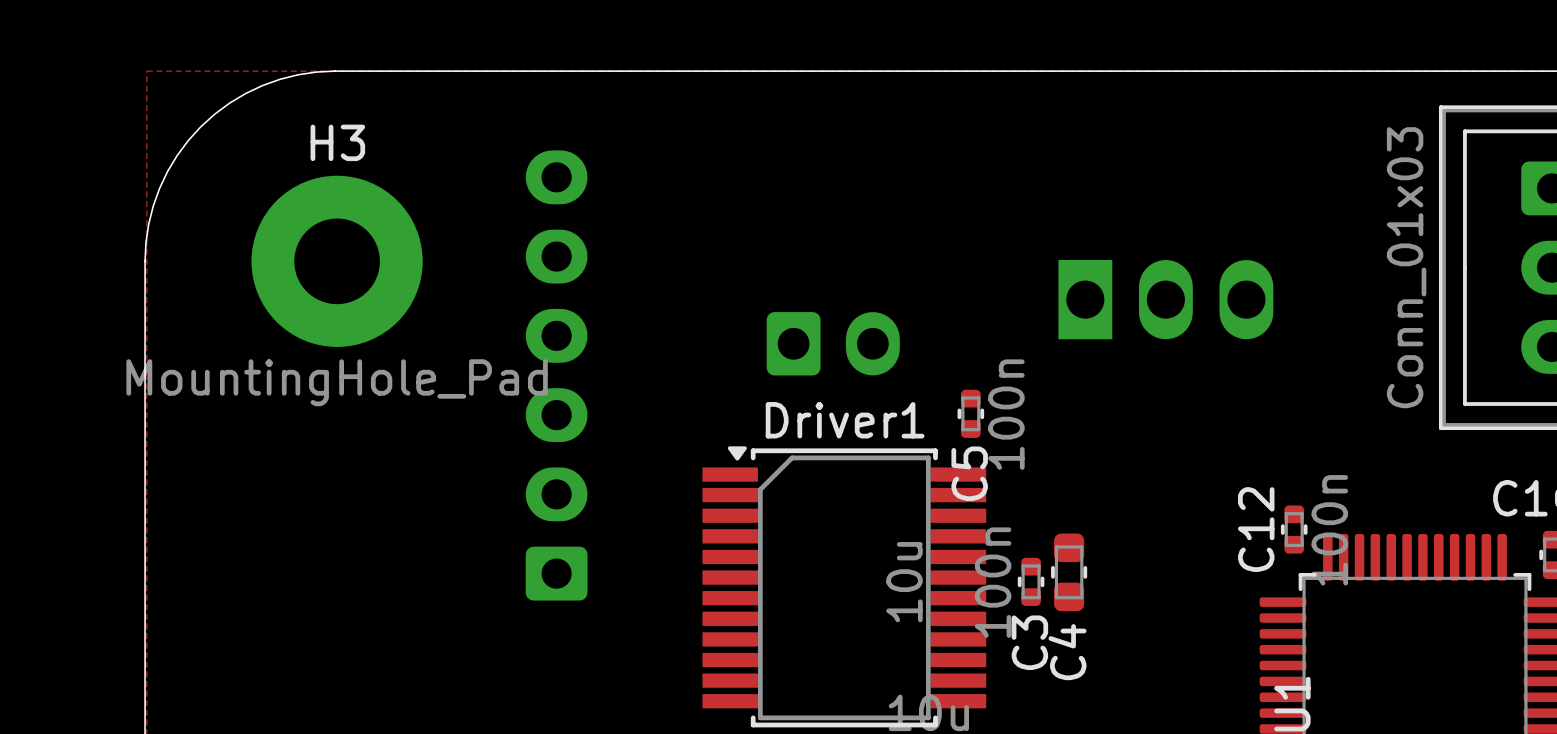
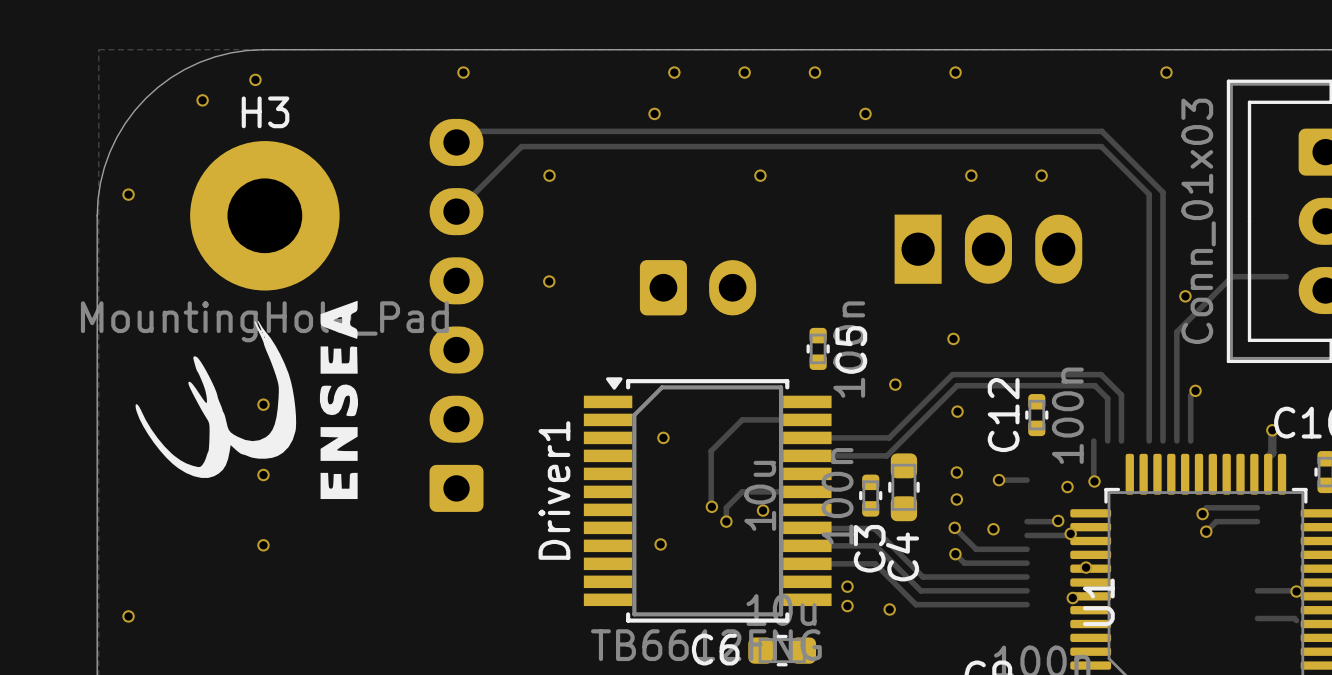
via: none -> (463, 72)
via: none -> (674, 72)
via: none -> (744, 72)
via: none -> (814, 72)
via: none -> (955, 72)
via: none -> (1166, 72)
via: none -> (255, 79)
via: none -> (202, 100)
via: none -> (654, 113)
via: none -> (865, 113)
track: none -> (456, 142) (467, 131) (1101, 131) (1163, 192) (1163, 441)
via: none -> (549, 175)
via: none -> (760, 175)
via: none -> (971, 175)
via: none -> (1041, 175)
via: none -> (128, 194)
track: none -> (456, 211) (521, 146) (1101, 146) (1149, 194) (1149, 441)
track: none -> (1286, 276) (1232, 276) (1176, 332) (1176, 441)
via: none -> (549, 281)
via: none -> (1185, 296)
drawing: none -> [135, 300, 359, 500]
via: none -> (953, 338)
Driver1 name rotation: 0° (845, 420) -> 90° counterclockwise (554, 490)
Driver1 name position: Driver1 (845, 420) -> Driver1 (554, 490)
via: none -> (895, 384)
track: none -> (1195, 390) (1190, 395) (1190, 441)
via: none -> (1195, 390)
C5 name position: C5 (969, 473) -> C5 (851, 350)
via: none -> (263, 404)
via: none -> (957, 411)
track: none -> (807, 419) (742, 419) (711, 451) (711, 506)
track: none -> (1272, 430) (1272, 452) (1270, 455)
via: none -> (1272, 430)
via: none -> (663, 437)
track: none -> (807, 437) (889, 437) (952, 374) (1101, 374) (1121, 395) (1121, 441)
track: none -> (1093, 441) (1094, 481)
track: none -> (1107, 441) (1107, 398) (1094, 385) (957, 385) (886, 455) (807, 455)
C12 position: (1294, 529) -> (1036, 415)
via: none -> (956, 472)
via: none -> (263, 474)
track: none -> (999, 480) (1027, 480)
via: none -> (999, 480)
via: none -> (1094, 481)
via: none -> (1067, 487)
track: none -> (807, 491) (742, 491) (726, 507) (726, 521)
via: none -> (956, 499)
via: none -> (711, 506)
track: none -> (1257, 507) (1206, 507) (1202, 514)
via: none -> (763, 510)
via: none -> (1202, 514)
track: none -> (1058, 520) (1027, 521)
via: none -> (1058, 520)
via: none -> (726, 521)
track: none -> (1257, 521) (1216, 521) (1206, 531)
track: none -> (807, 527) (874, 528) (922, 576) (1027, 576)
track: none -> (954, 527) (976, 549) (1027, 549)
via: none -> (954, 527)
via: none -> (993, 529)
via: none -> (1206, 531)
track: none -> (1070, 533) (1069, 535) (1027, 535)
via: none -> (1070, 533)
via: none -> (660, 544)
via: none -> (263, 545)
track: none -> (807, 545) (875, 545) (920, 590) (1027, 590)
track: none -> (955, 554) (964, 563) (1027, 563)
via: none -> (955, 554)
track: none -> (807, 563) (875, 563) (915, 604) (1027, 604)
via: none -> (1086, 567)
via: none -> (847, 586)
track: none -> (1257, 590) (1296, 591)
via: none -> (1296, 591)
via: none -> (1072, 598)
via: none -> (847, 606)
via: none -> (889, 609)
via: none -> (128, 616)
track: none -> (1257, 618) (1294, 618) (1296, 620)

